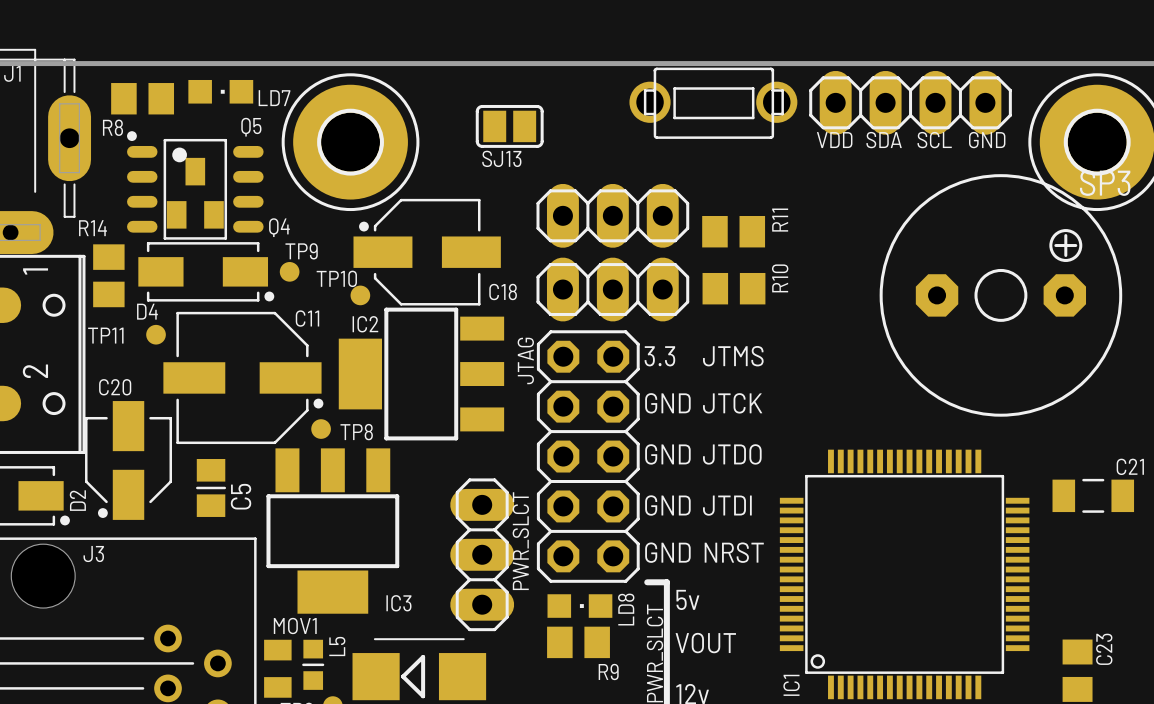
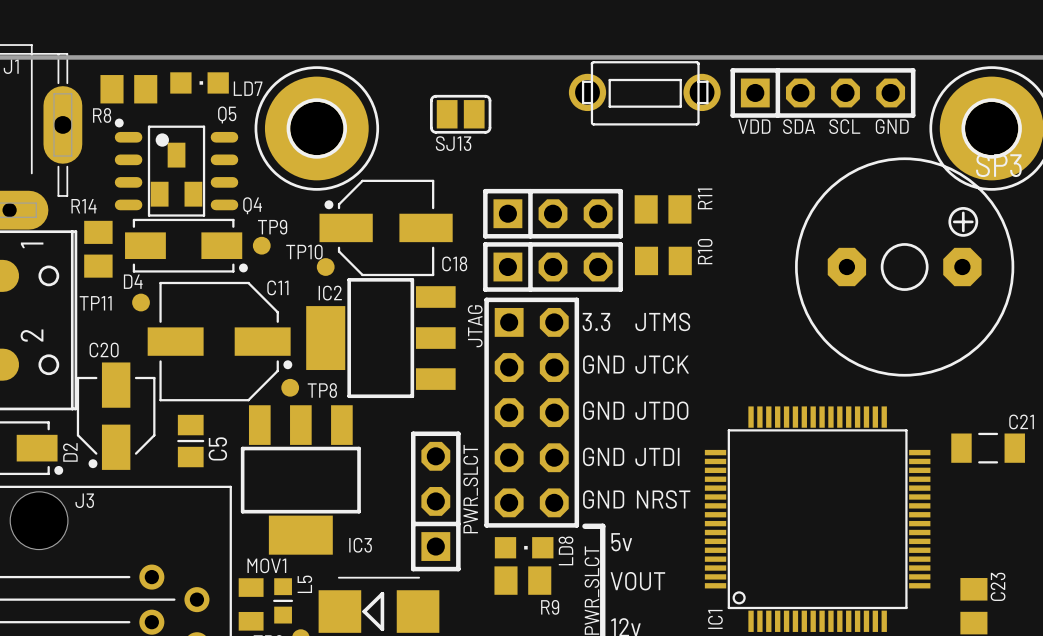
part footprint: [809, 70, 1012, 135] -> [730, 68, 916, 118]
part: (612, 215) -> none
part: none -> (553, 213)
part footprint: [536, 257, 690, 322] -> [483, 242, 623, 292]
JTAG footprint: [536, 330, 640, 583] -> [484, 297, 580, 528]
PWR_SLCT footprint: [450, 478, 515, 632] -> [411, 431, 461, 572]

